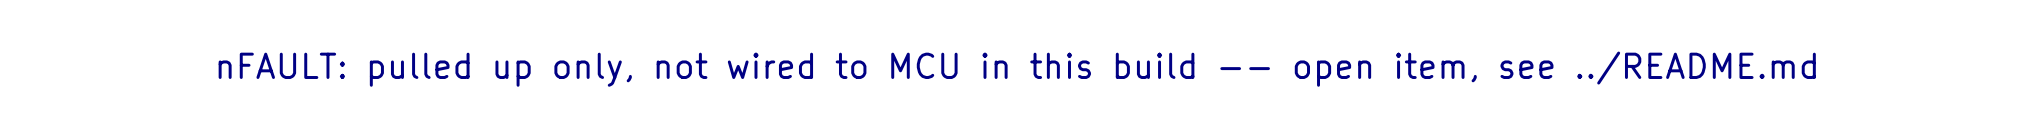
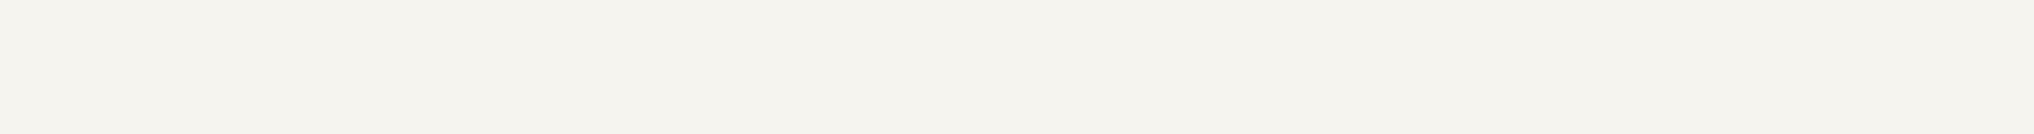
text: nFAULT: pulled up only, not wired to MCU in this build -- open item, see ../README.md (1017, 69) -> none

